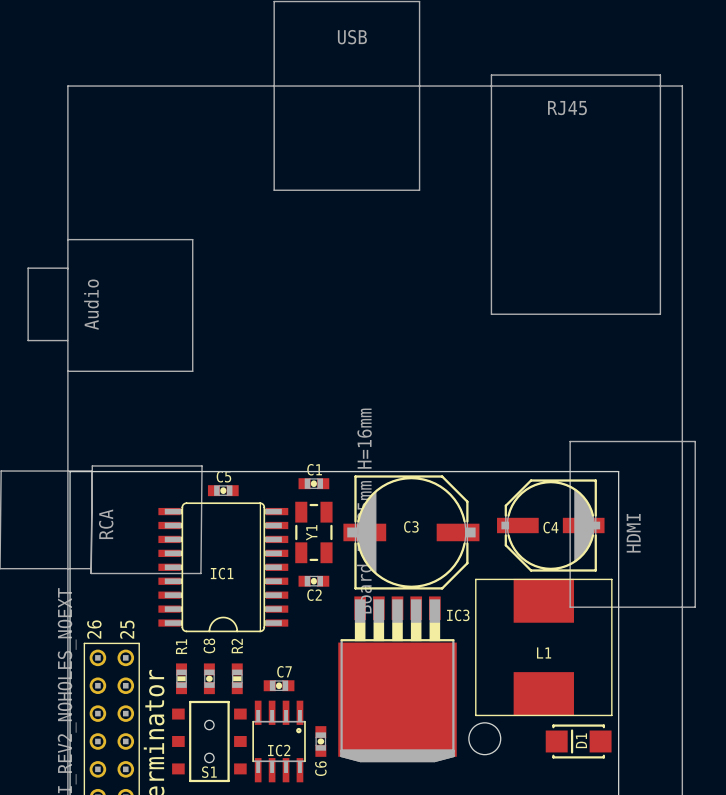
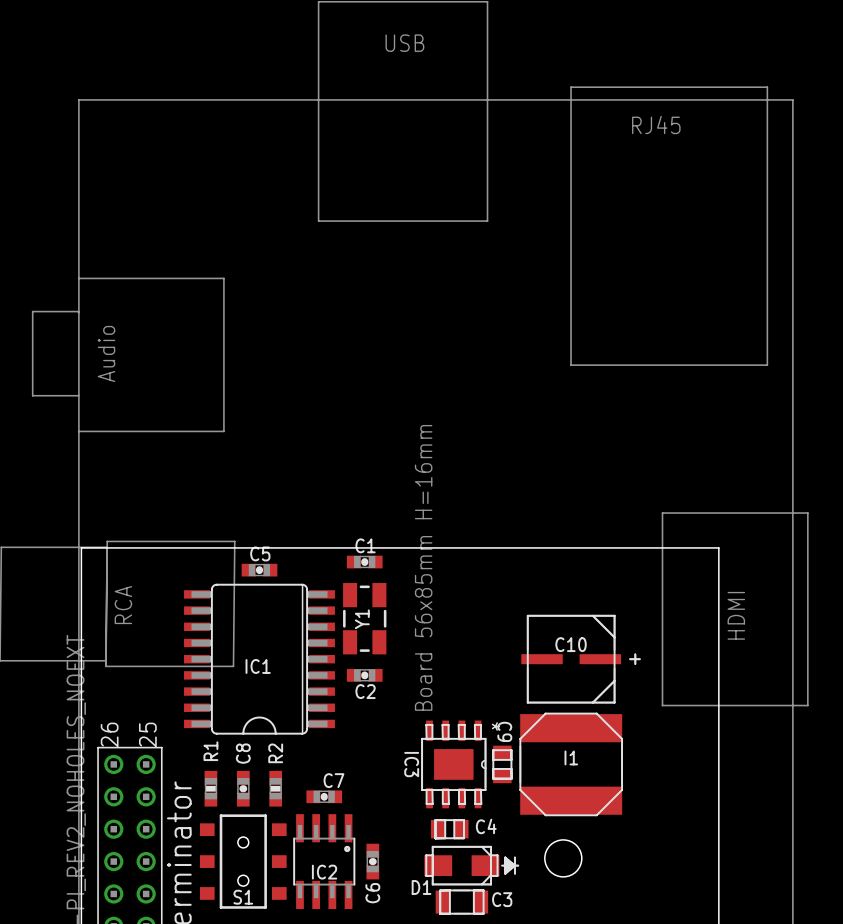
C3 footprint: [343, 475, 480, 590] -> [435, 889, 489, 915]
C4 footprint: [497, 479, 605, 572] -> [430, 819, 469, 840]
C3 name position: C3 (411, 526) -> C3 (502, 899)
C4 name position: C4 (550, 527) -> C4 (486, 826)
C10: none -> (581, 659)
IC3 footprint: [338, 596, 457, 763] -> [421, 720, 487, 809]
IC3 name position: IC3 (458, 615) -> IC3 (411, 764)
L1: (543, 647) -> none
C9: none -> (502, 764)
I1: none -> (571, 764)
D1 footprint: [545, 724, 612, 759] -> [424, 845, 520, 886]
D1 name position: D1 (581, 740) -> D1 (421, 887)

